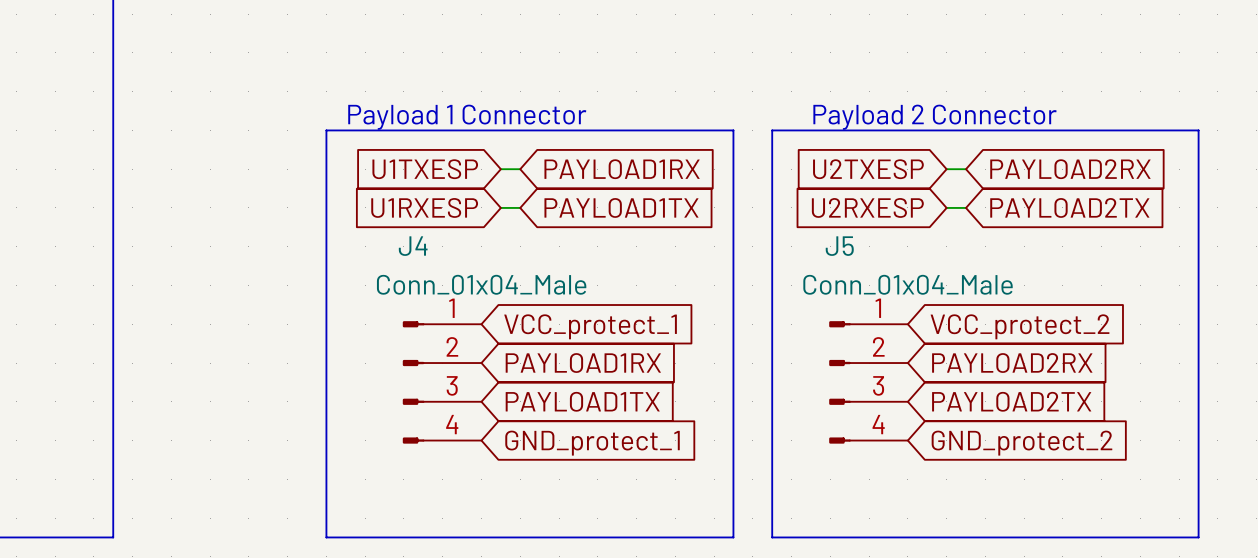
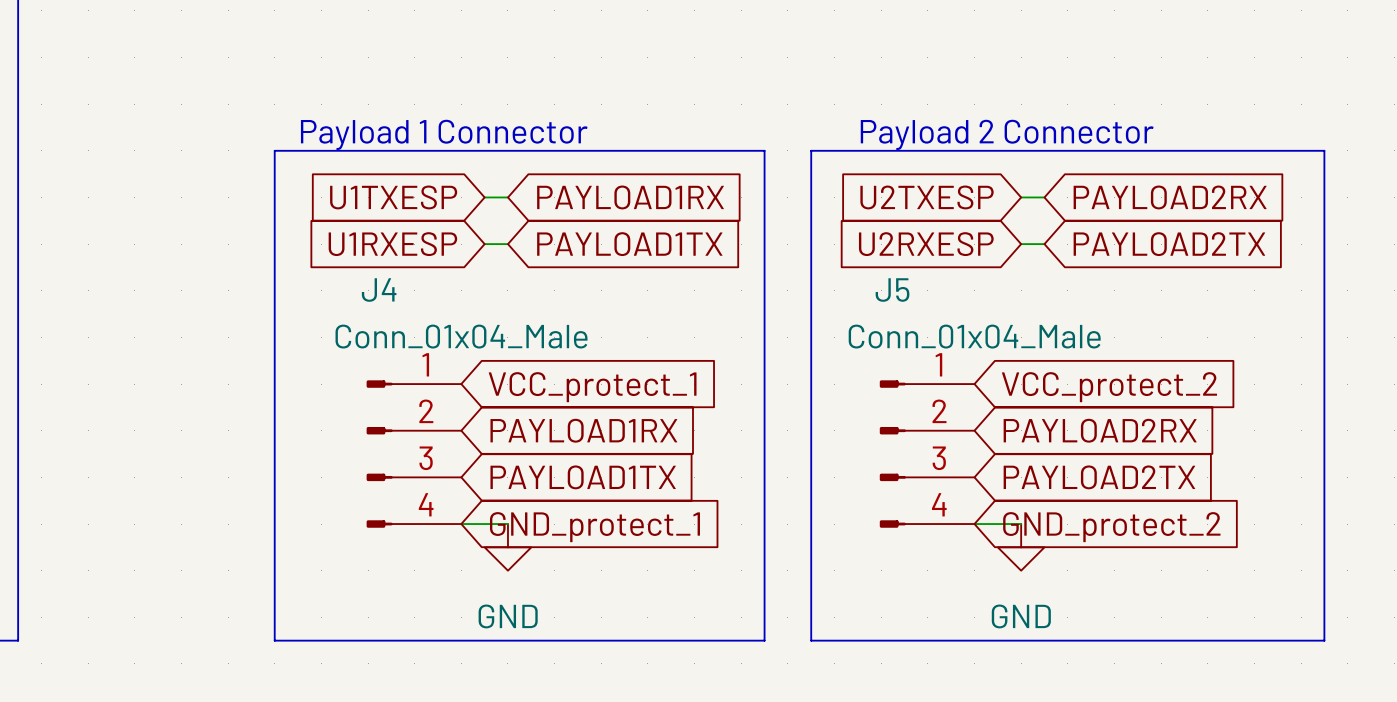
wire: none -> (461, 524) (507, 524)
wire: none -> (974, 524) (1021, 524)
power symbol: none -> GND (507, 547)
power symbol: none -> GND (1021, 547)

